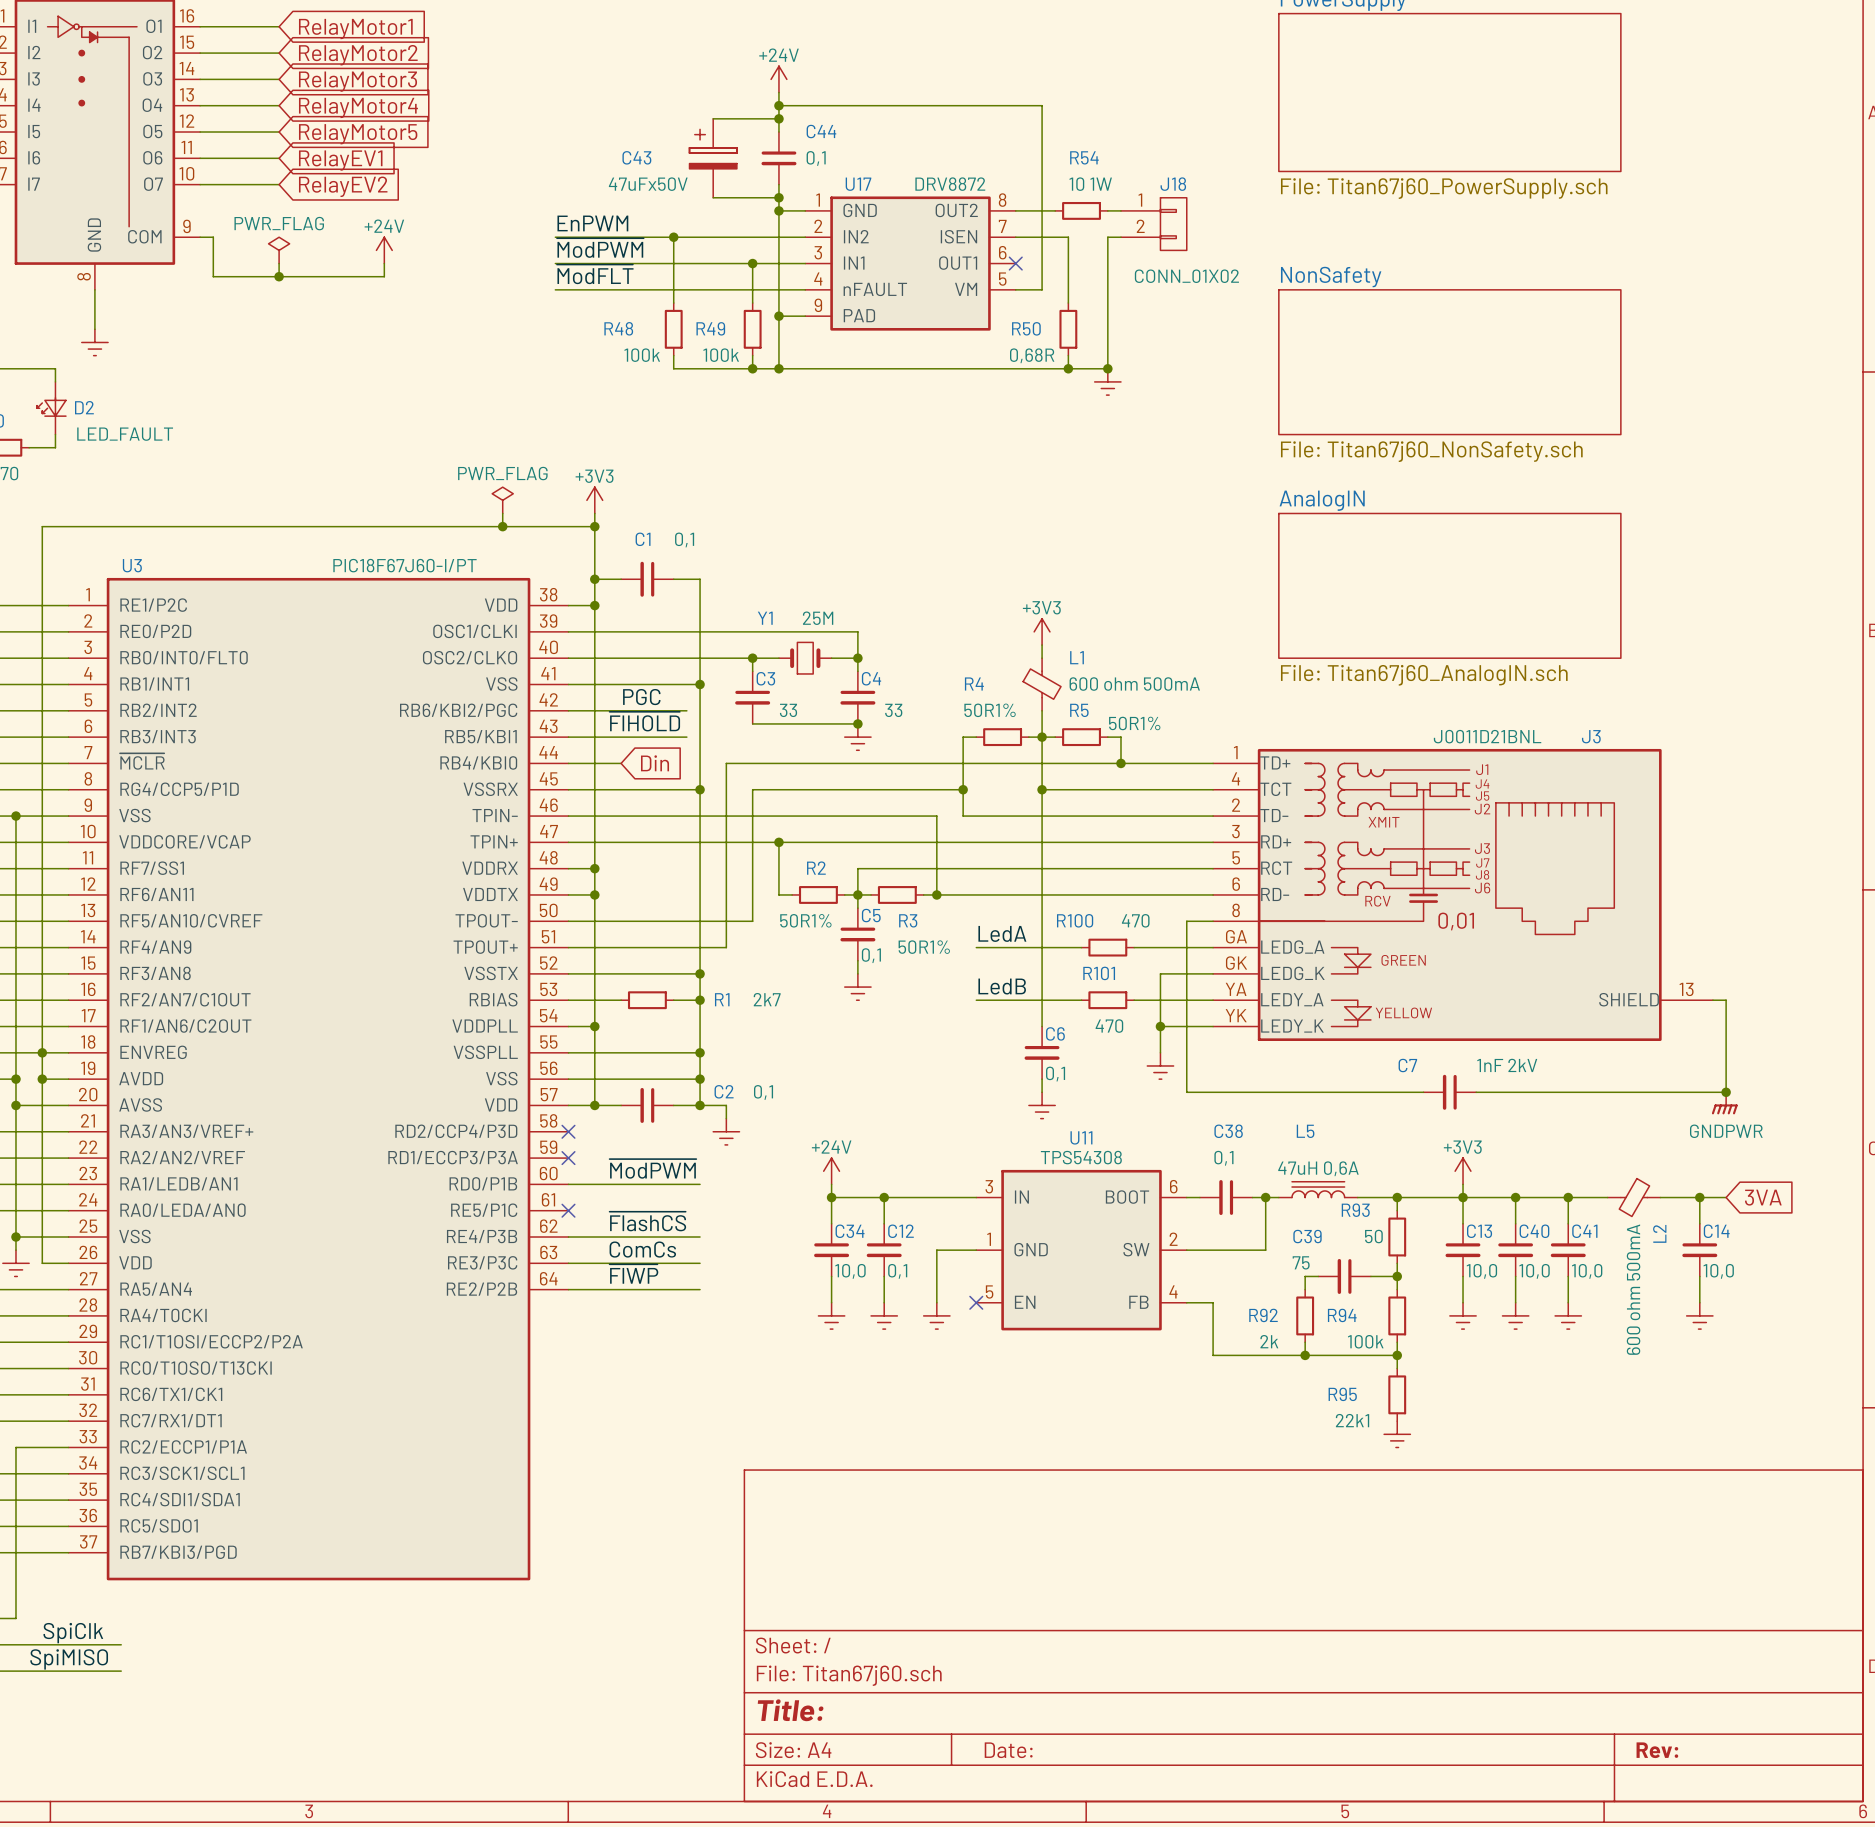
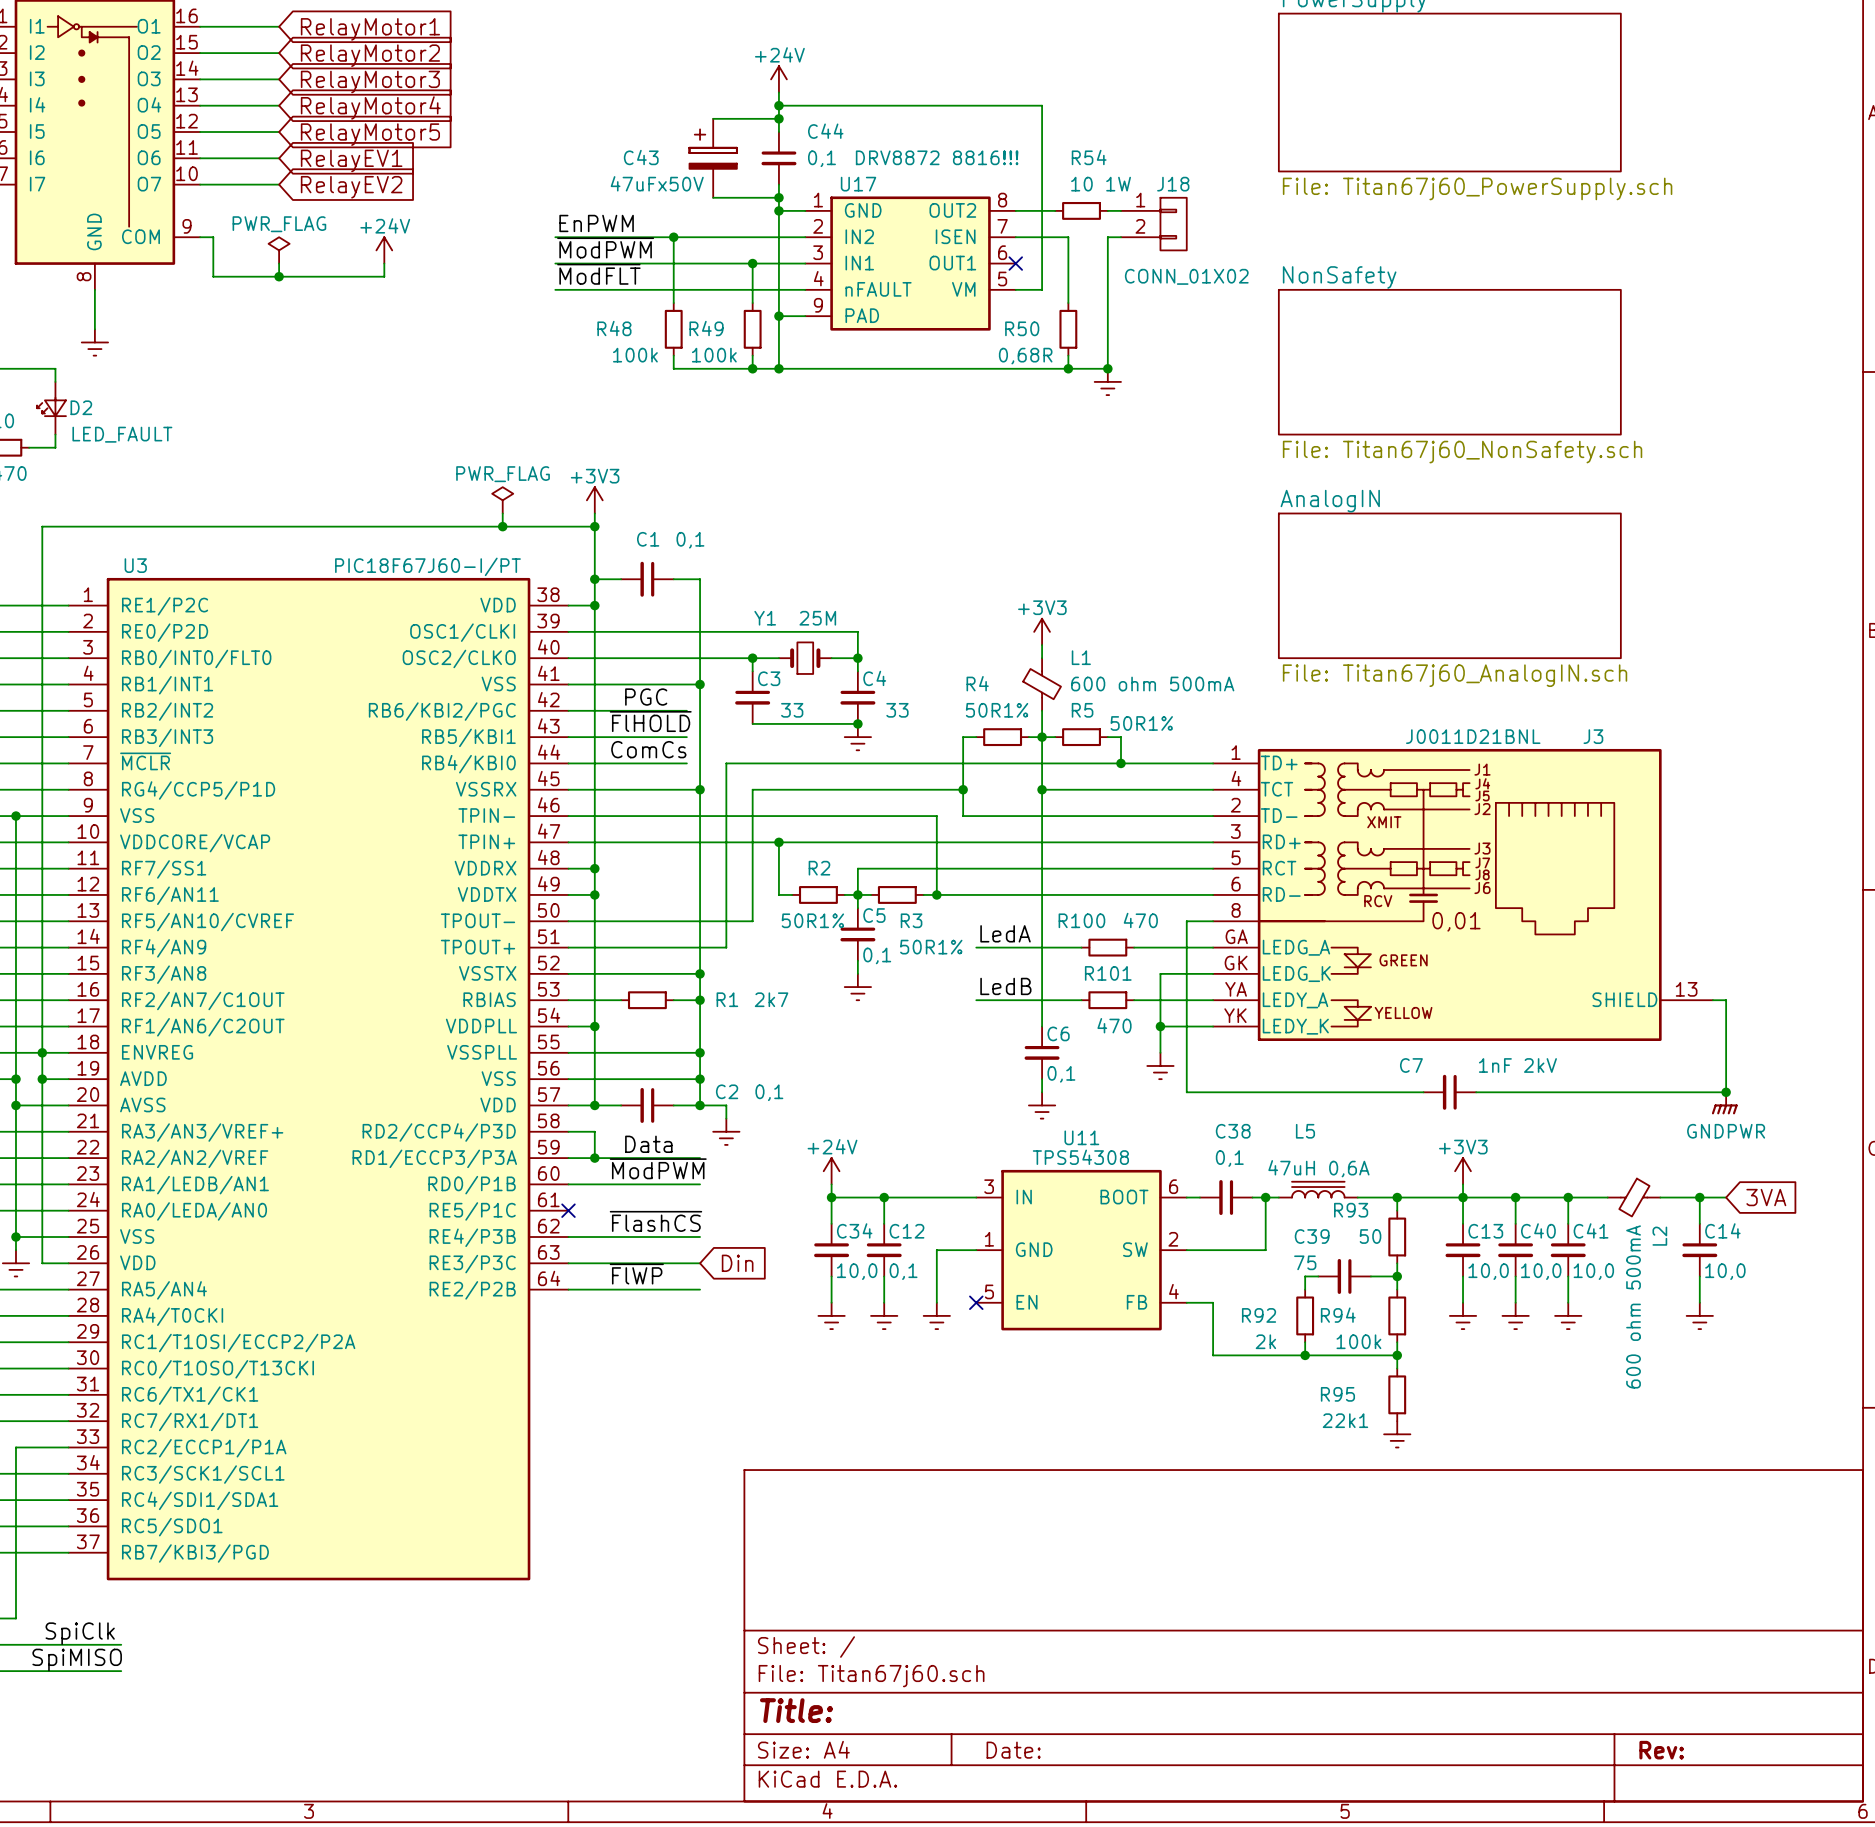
U17 value: DRV8872 (950, 184) -> DRV8872 8816!!! (937, 157)
label: none -> ComCs (648, 749)
wire: none -> (621, 763) (686, 763)
global label: Din (655, 763) -> none
wire: none -> (568, 1131) (594, 1131) (594, 1158)
no-connect mark: (568, 1131) -> none
label: none -> Data (648, 1144)
wire: none -> (568, 1158) (700, 1158)
no-connect mark: (568, 1158) -> none
junction: none -> (594, 1158)
label: ComCs (642, 1249) -> none
global label: none -> Din (737, 1263)

